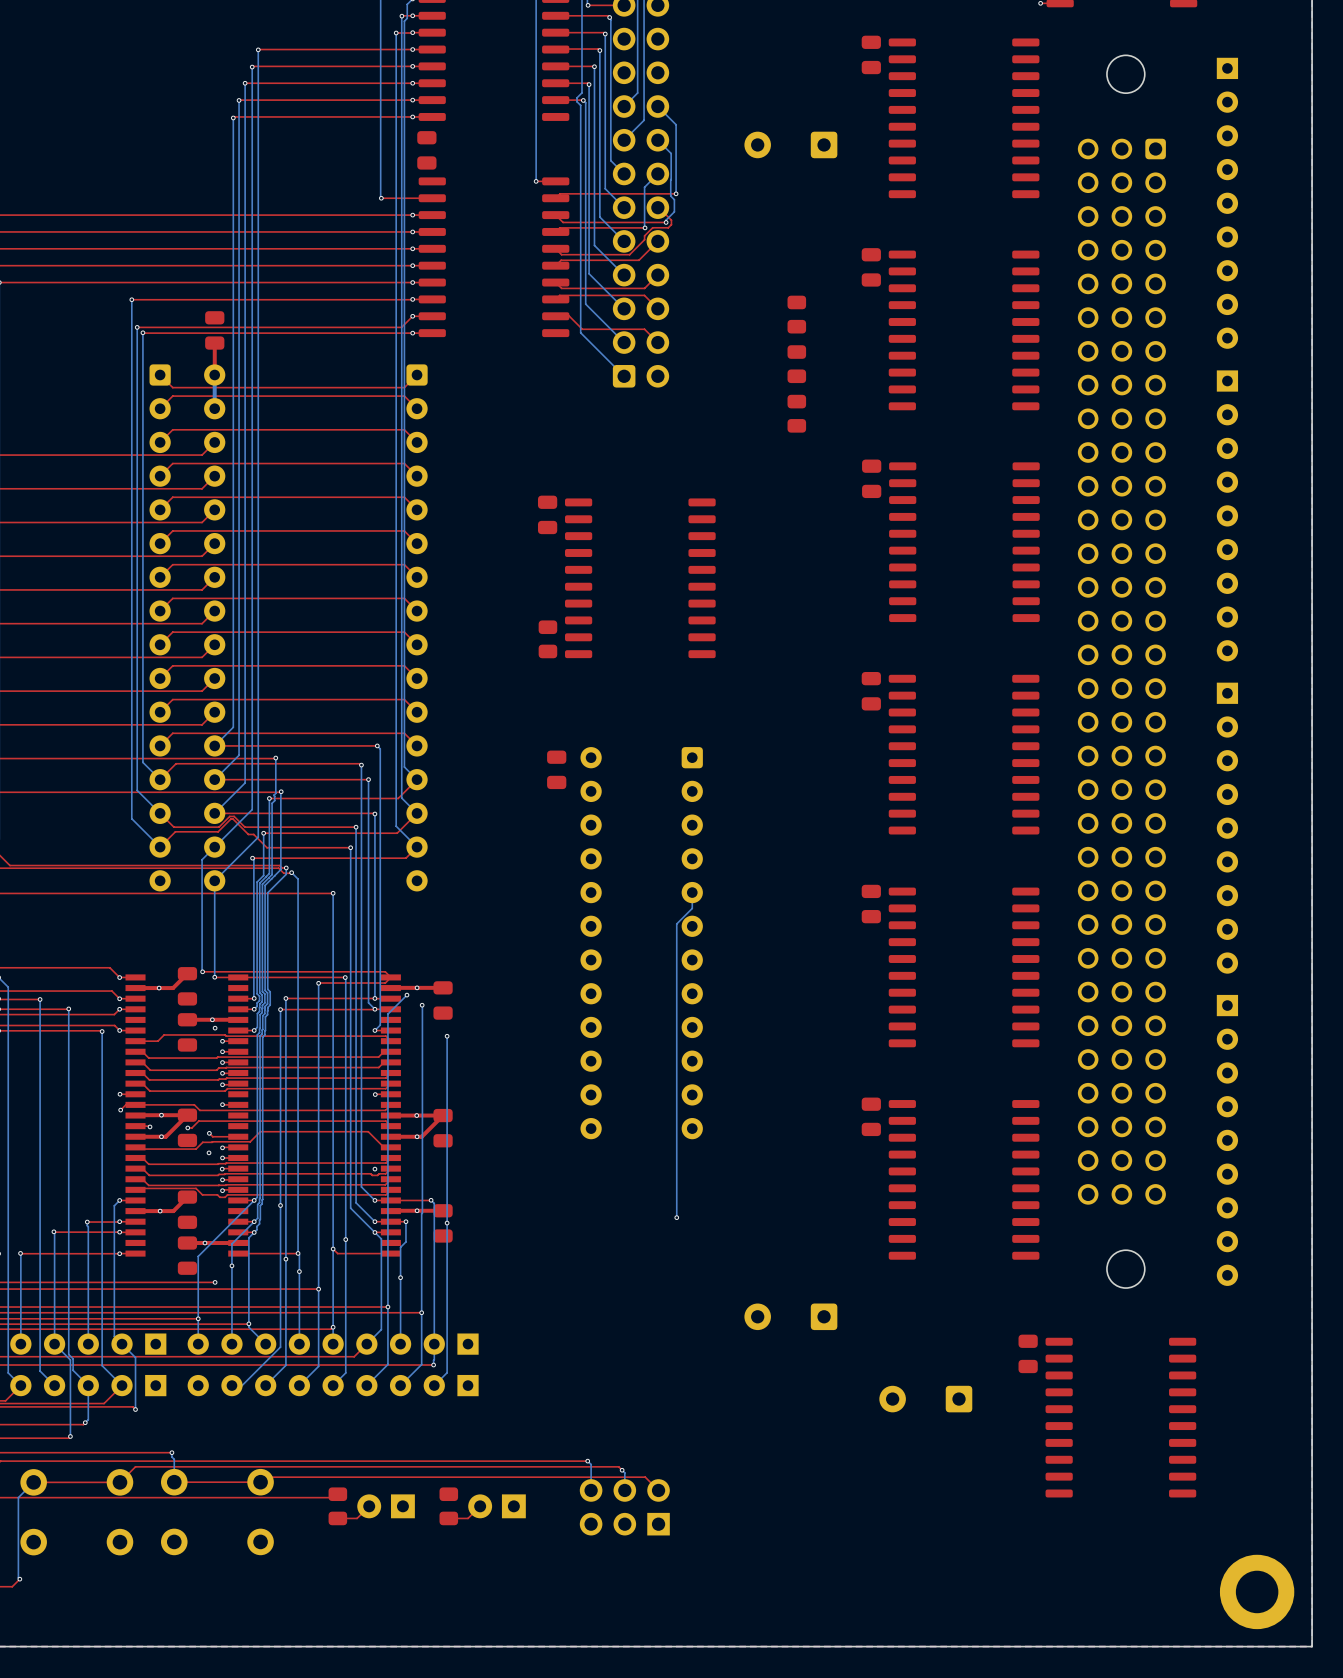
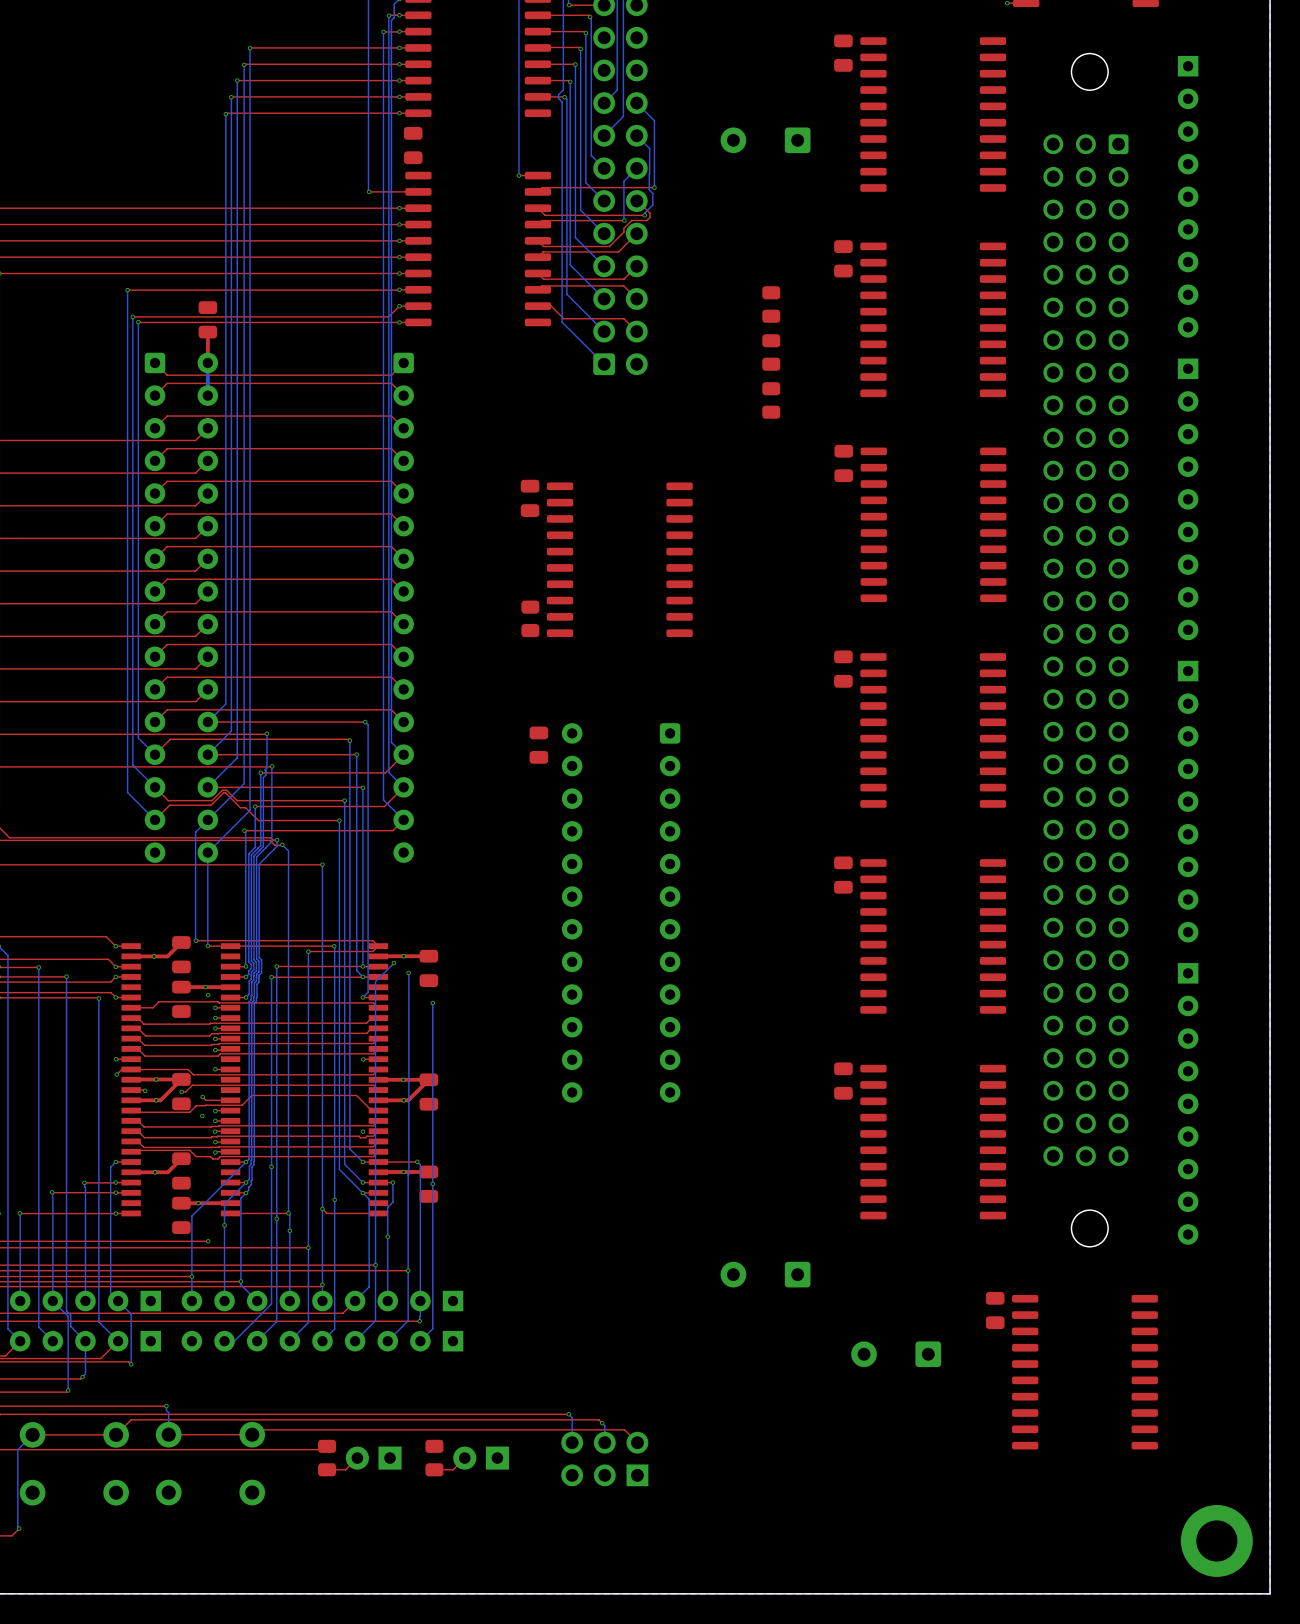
bottom track: (692, 892) (692, 908) (676, 923) (676, 1217) -> none
via: (676, 1217) -> none

